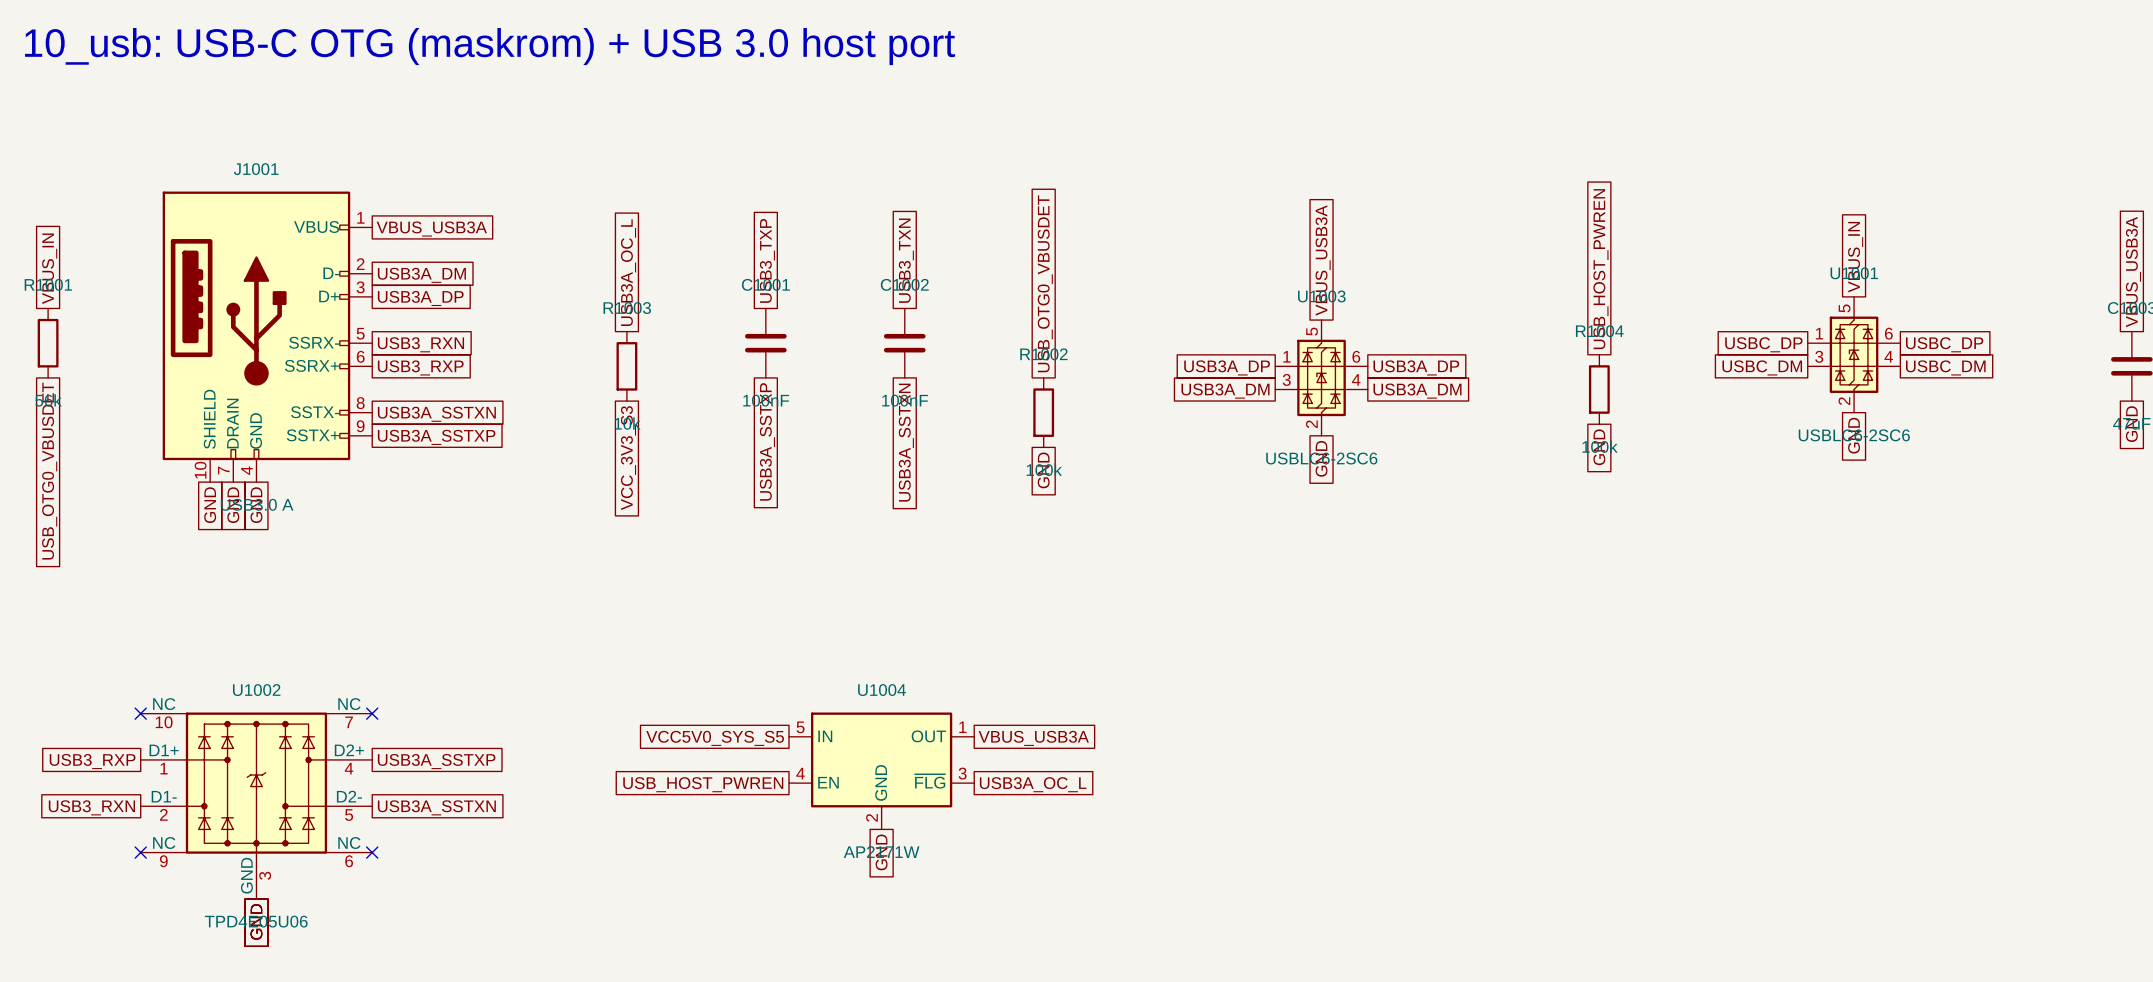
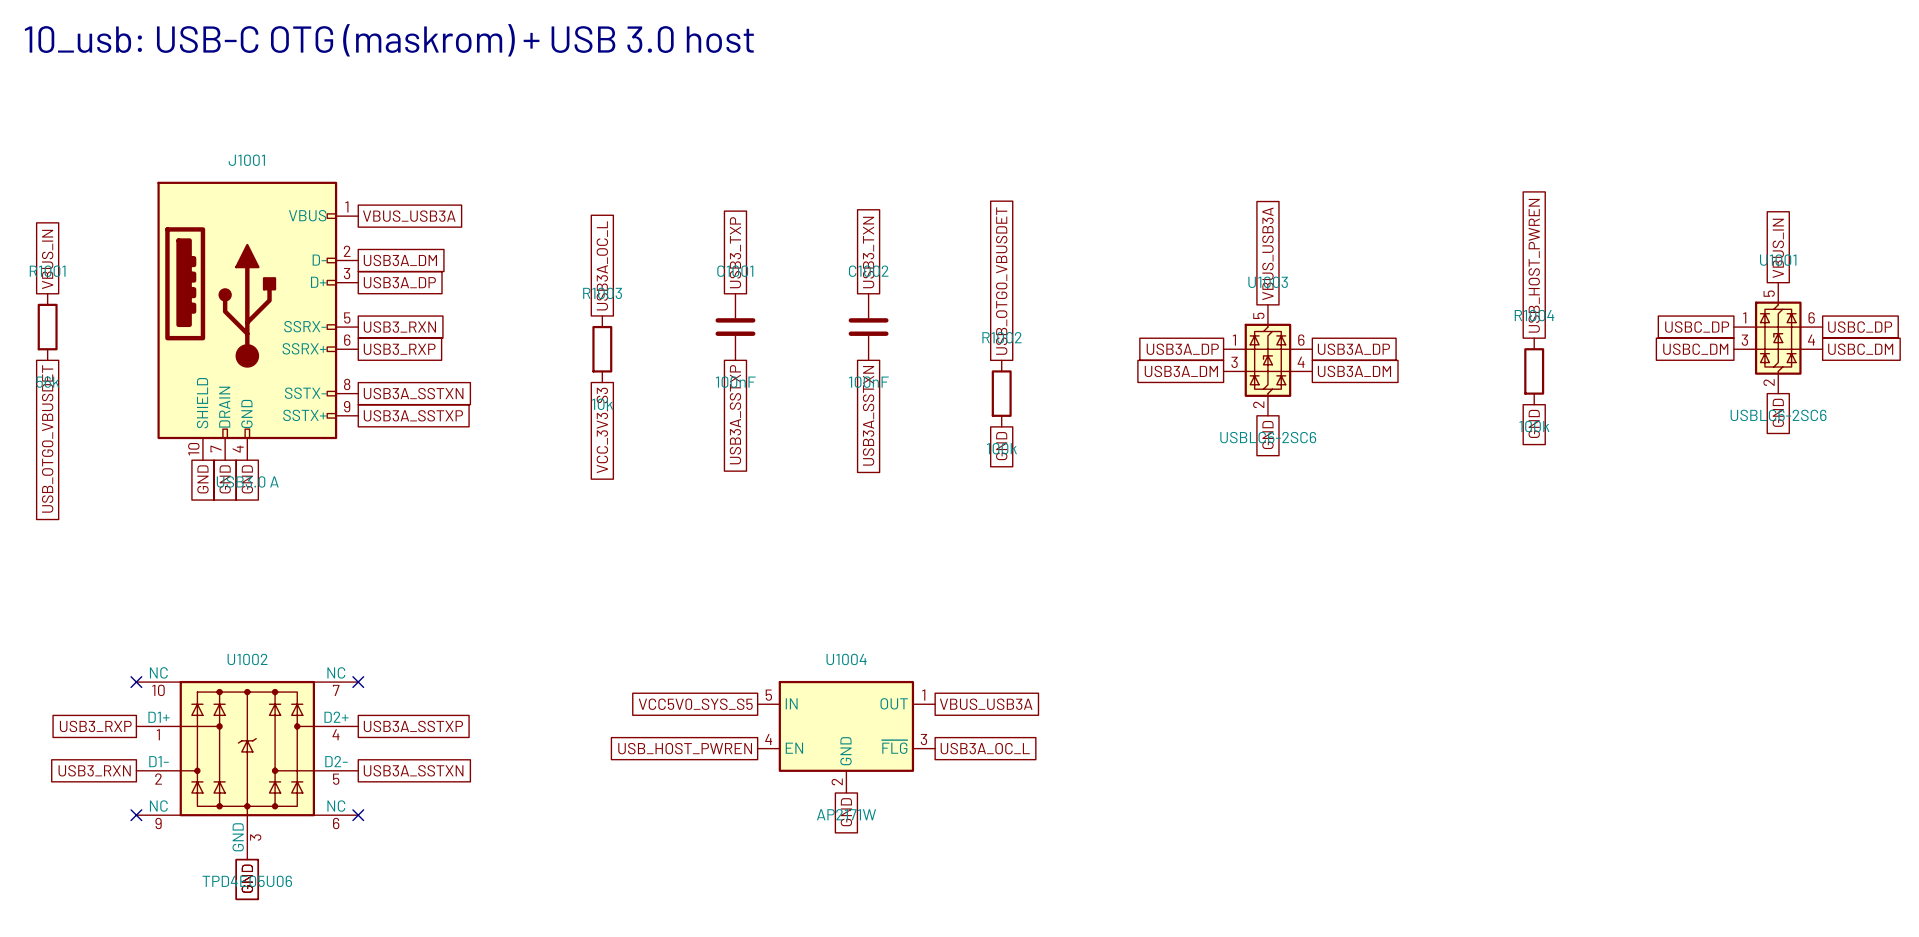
text: 10_usb: USB-C OTG (maskrom) + USB 3.0 host port (490, 46) -> 10_usb: USB-C OTG (maskrom) + USB 3.0 host (389, 40)

